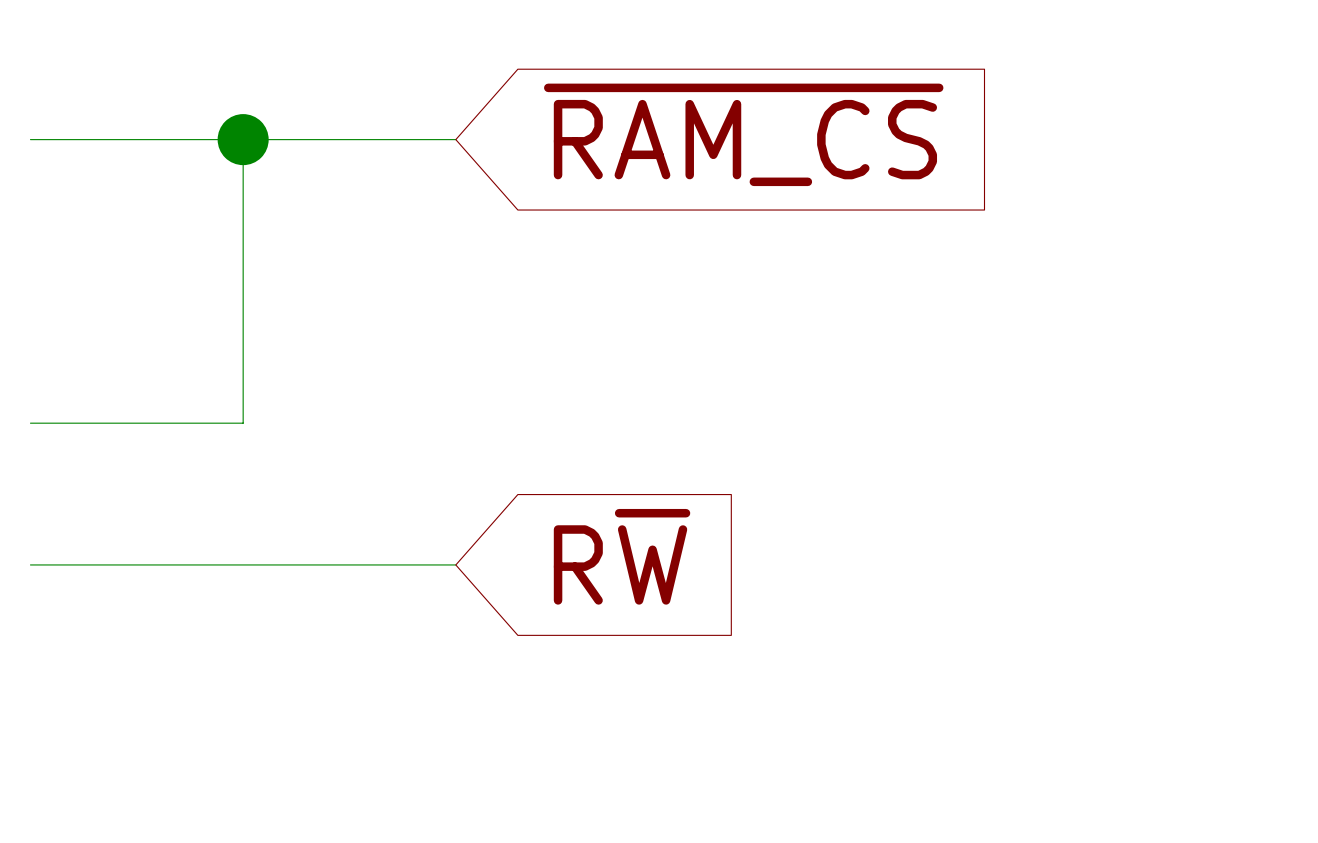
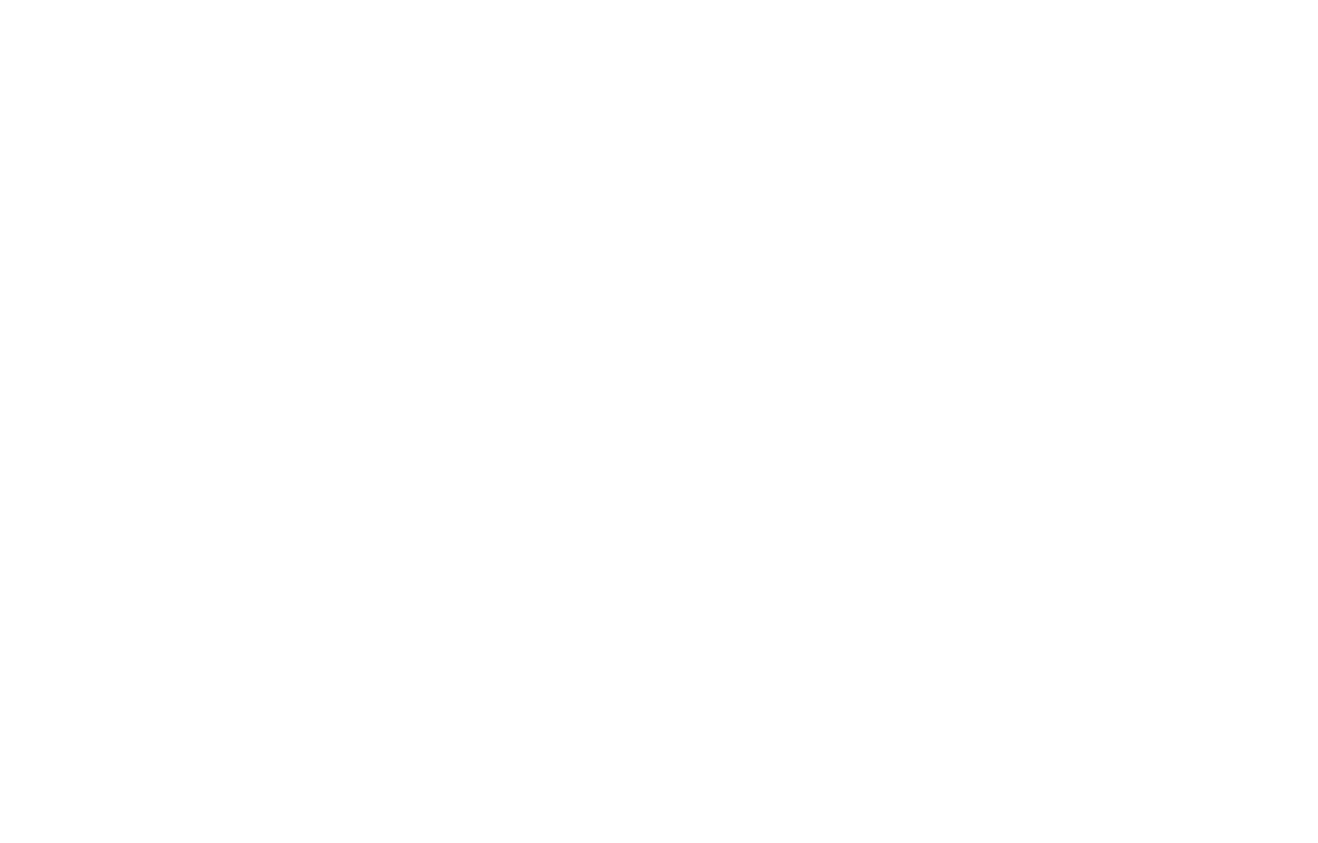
global label: ~{RAM_CS} (743, 134) -> none
wire: (30, 139) (455, 139) -> none
wire: (243, 139) (243, 423) (30, 423) -> none
junction: (243, 139) -> none
global label: R~{W} (622, 556) -> none
wire: (30, 564) (455, 564) -> none

